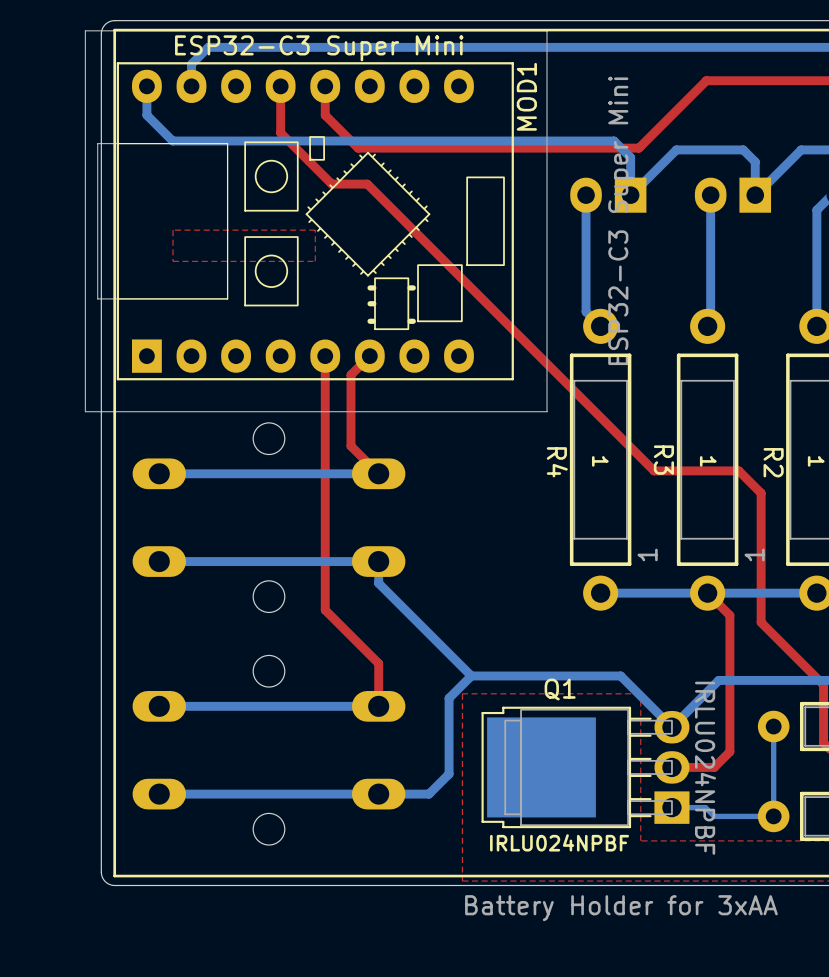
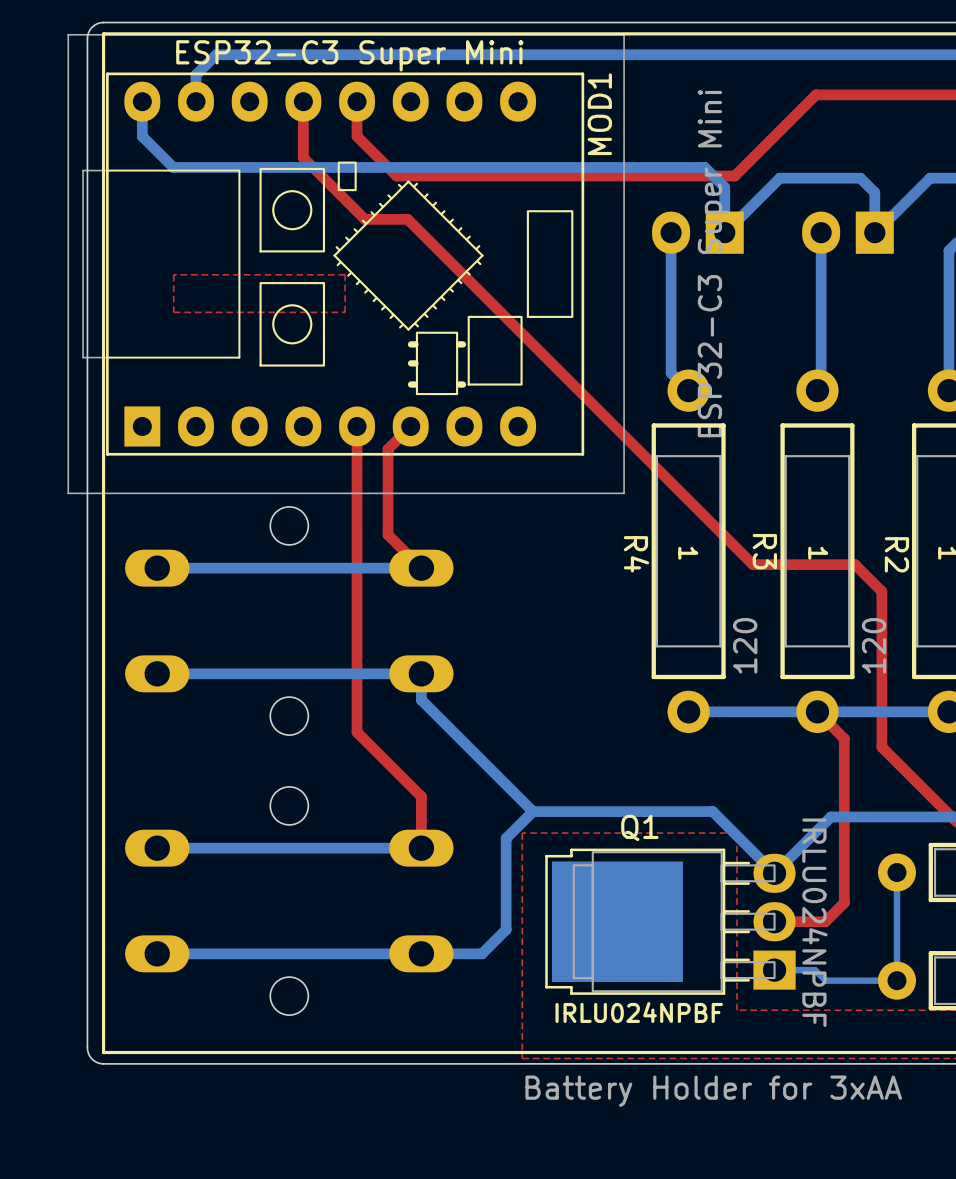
R4 value: 1 (647, 554) -> 120 (745, 645)
R3 value: 1 (754, 554) -> 120 (874, 645)

